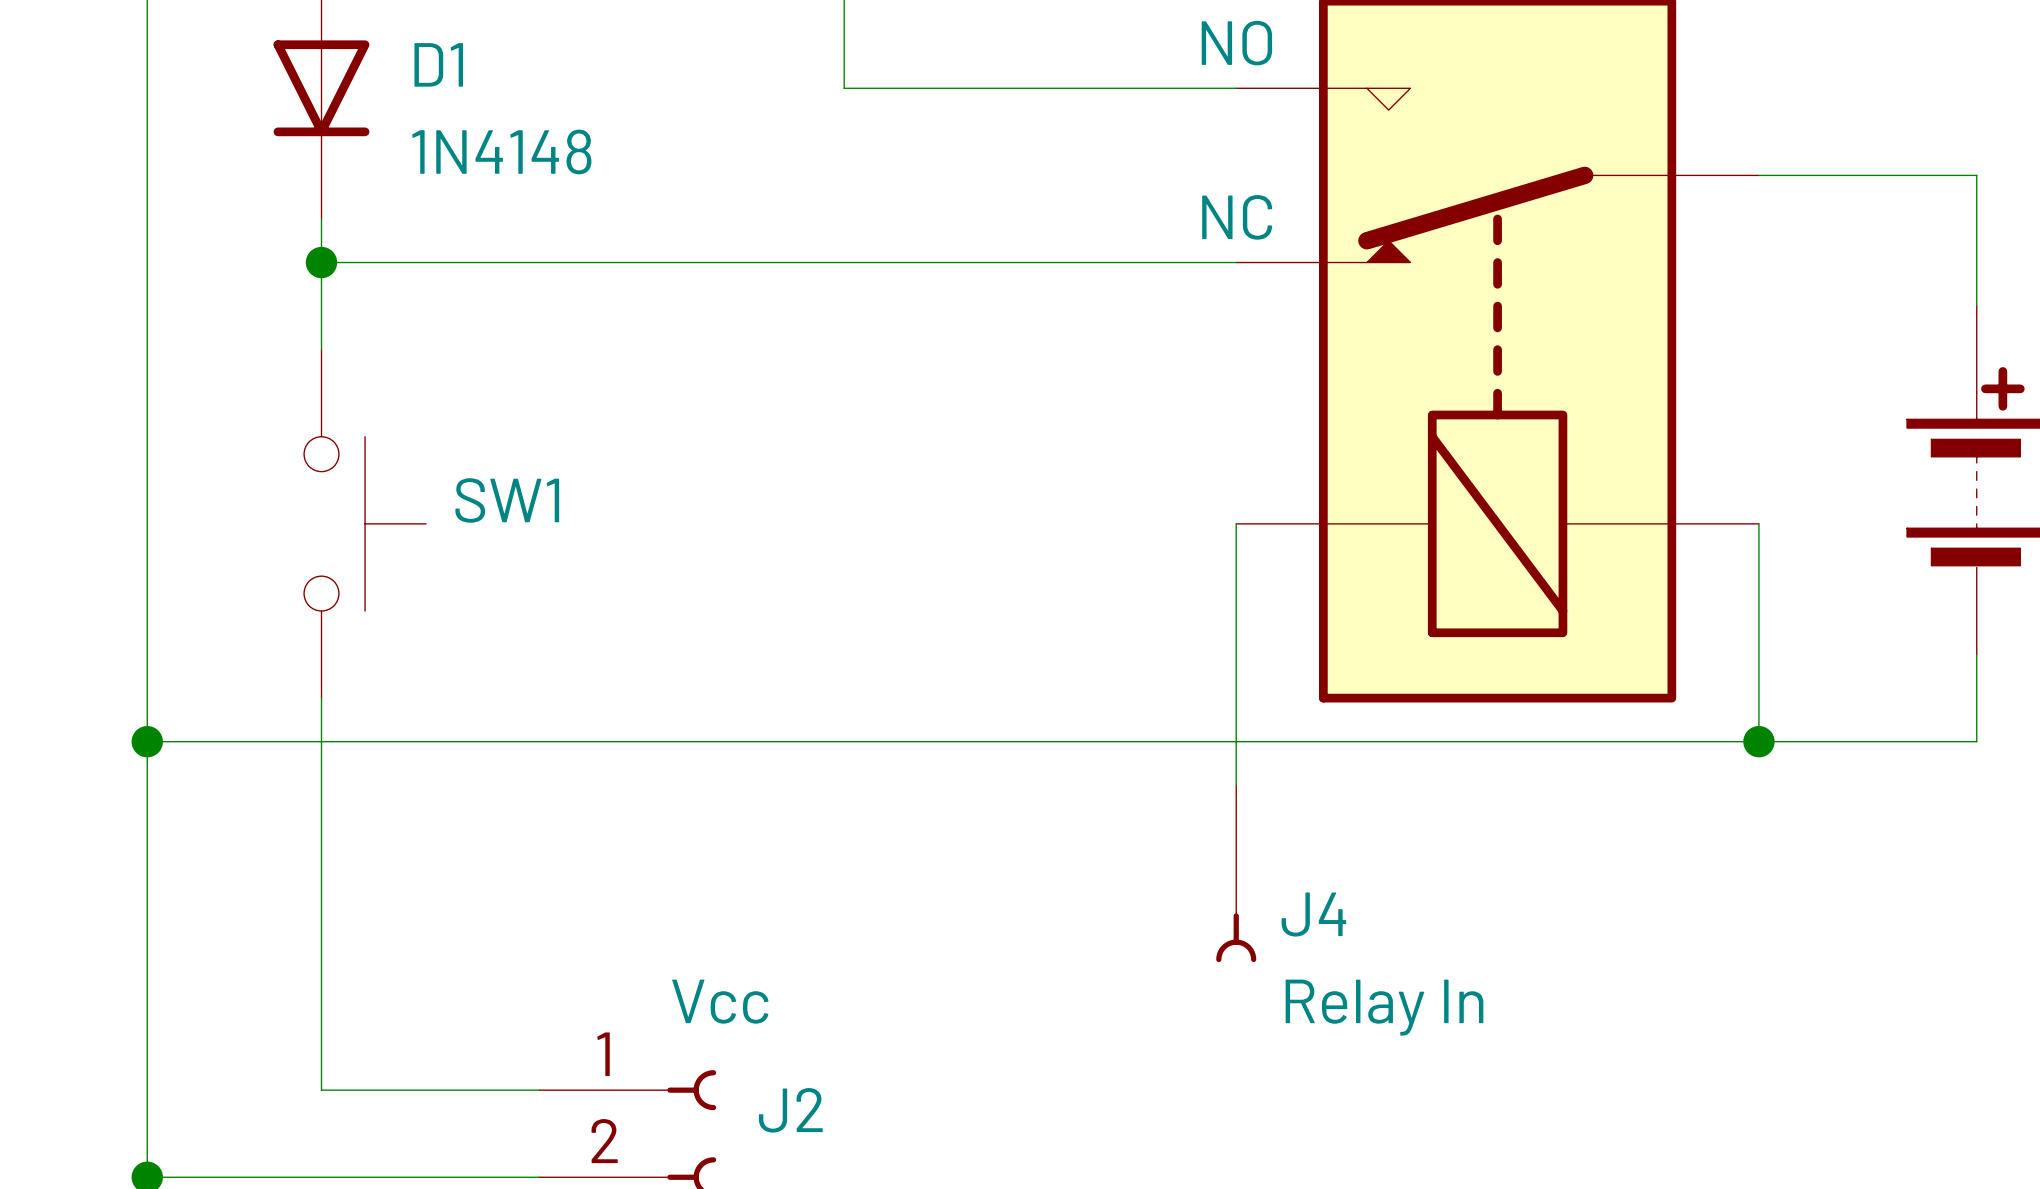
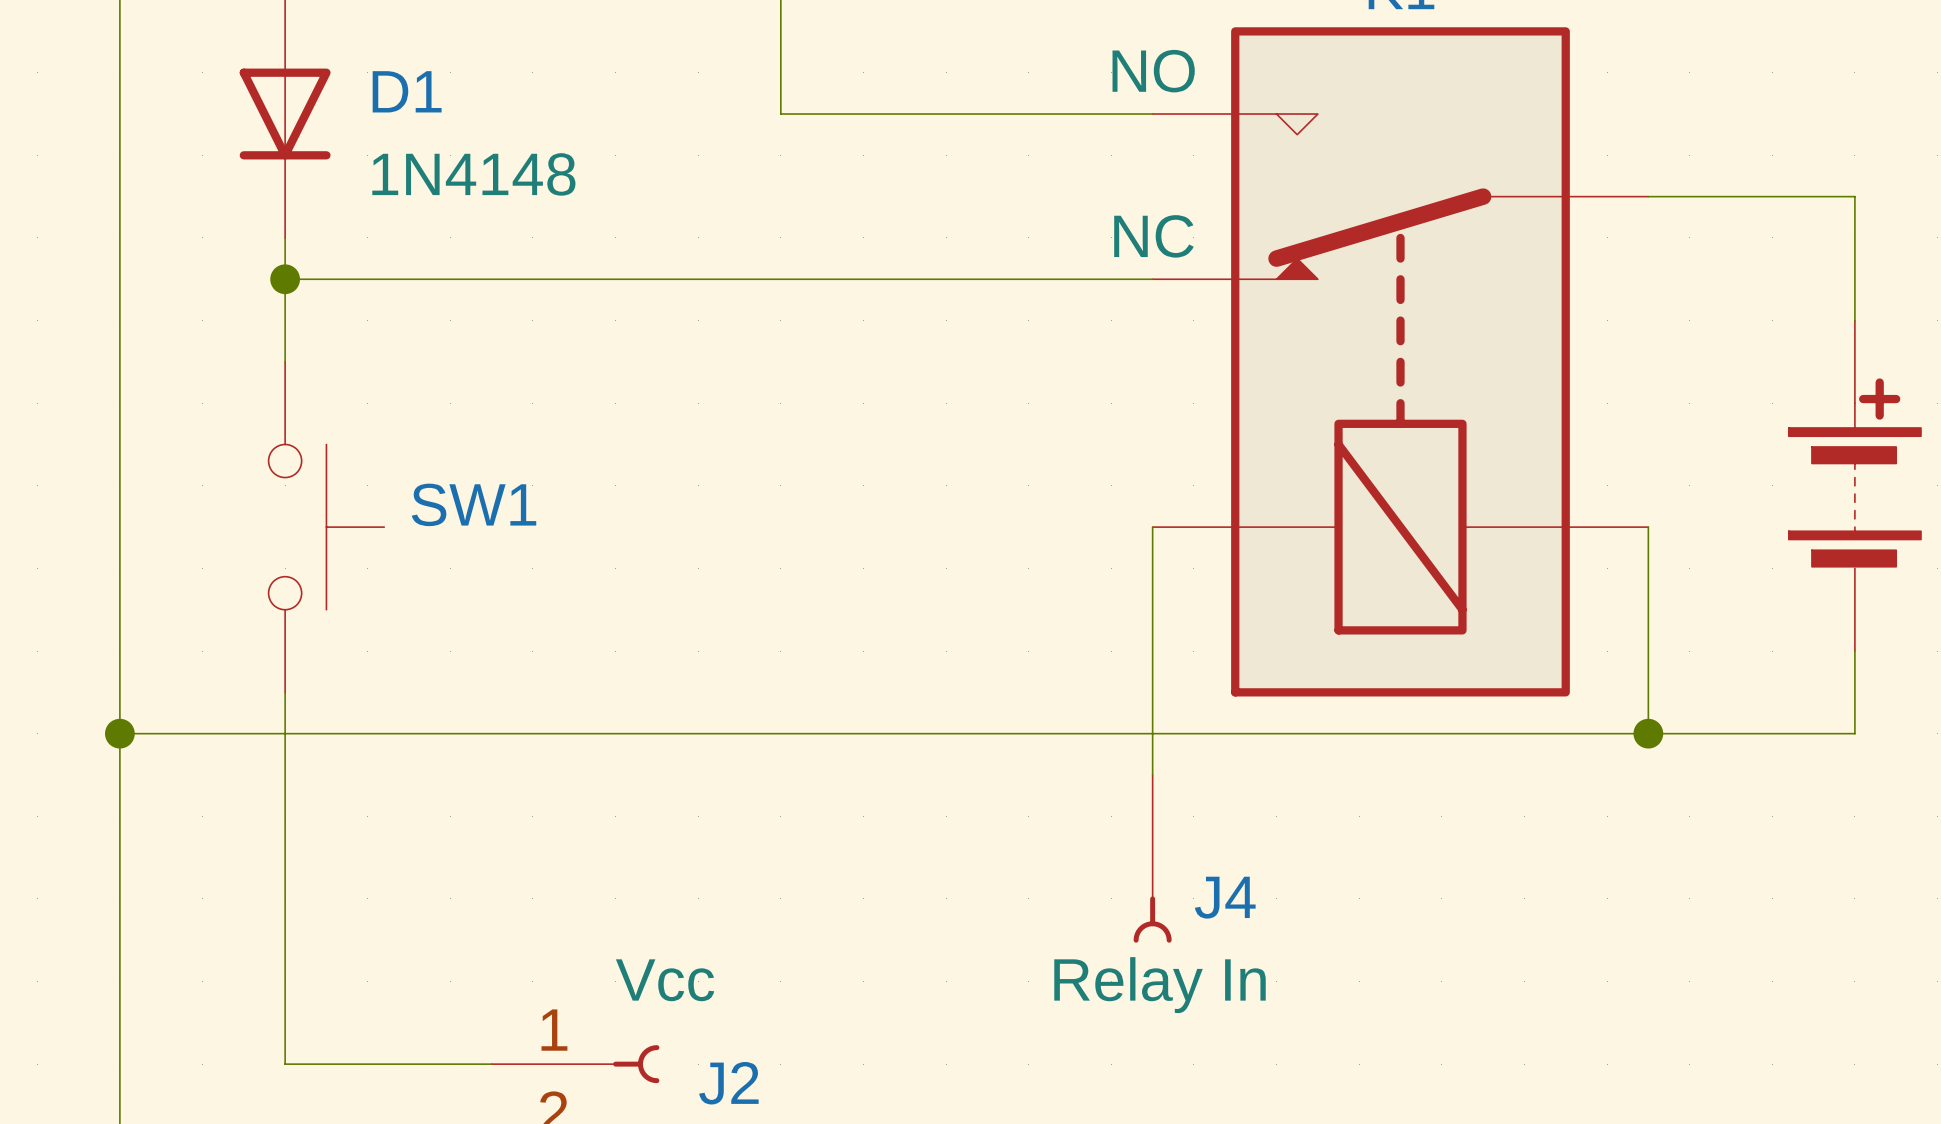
J4 value position: Relay In (1384, 1007) -> Relay In (1160, 985)

